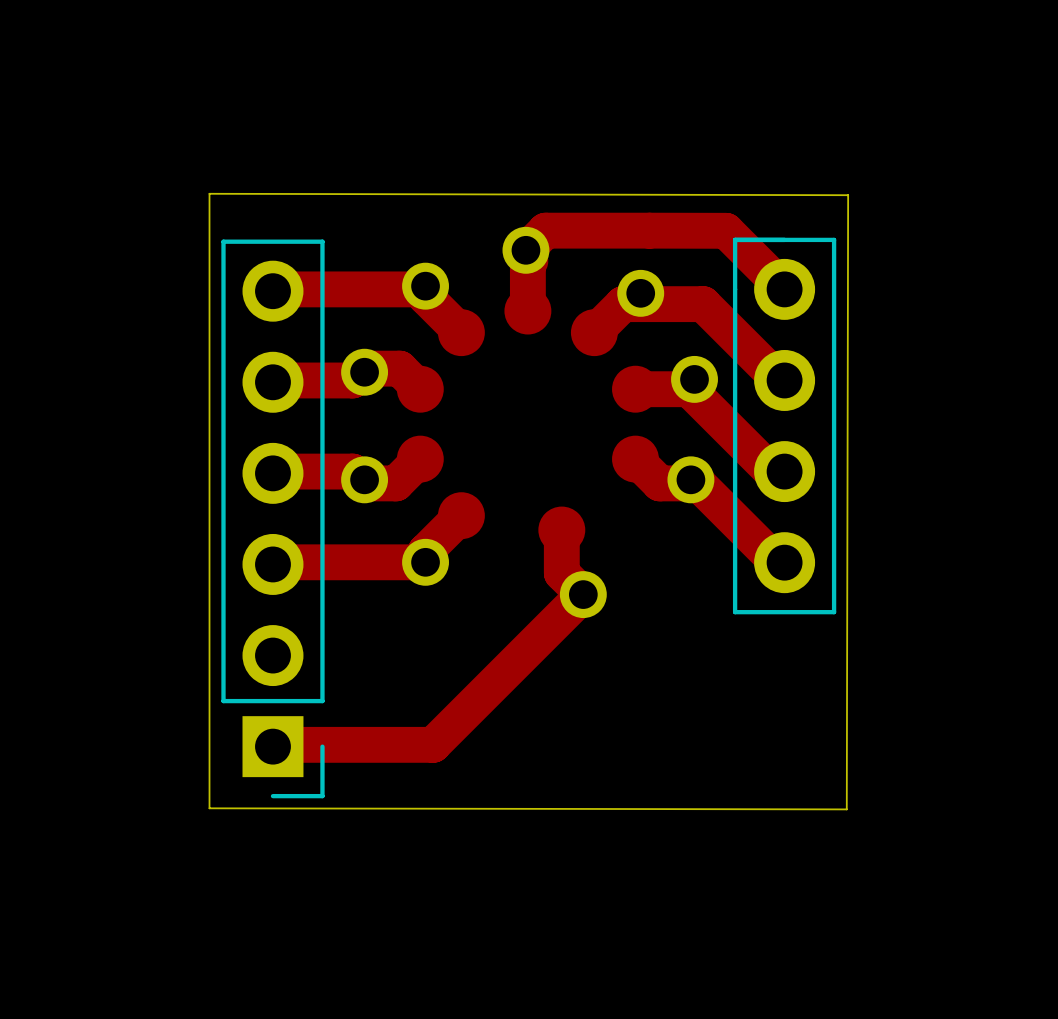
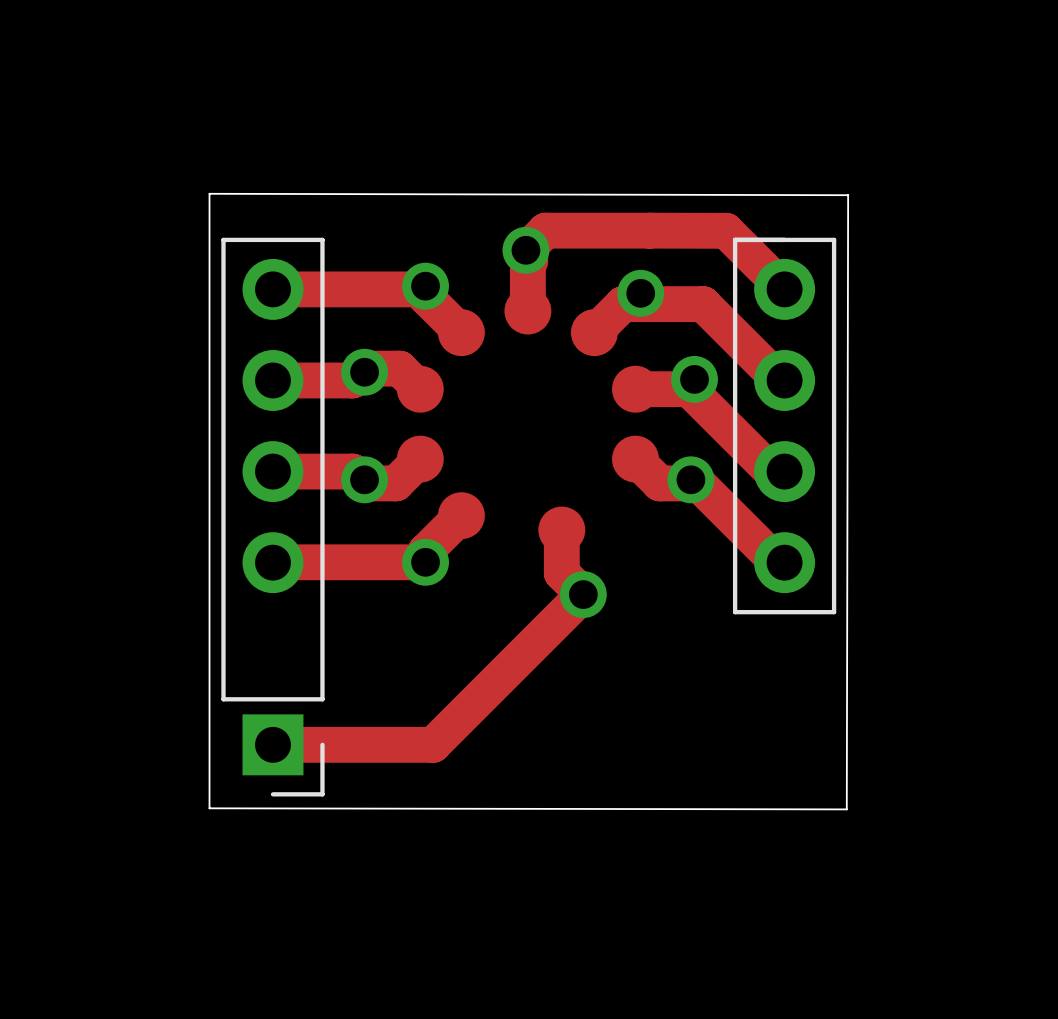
part footprint: [221, 239, 325, 799] -> [221, 237, 325, 797]

